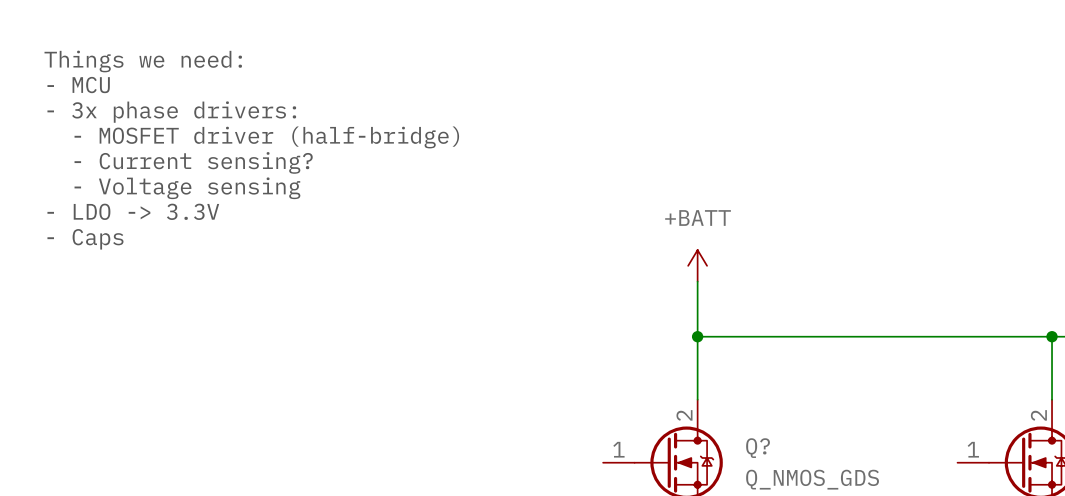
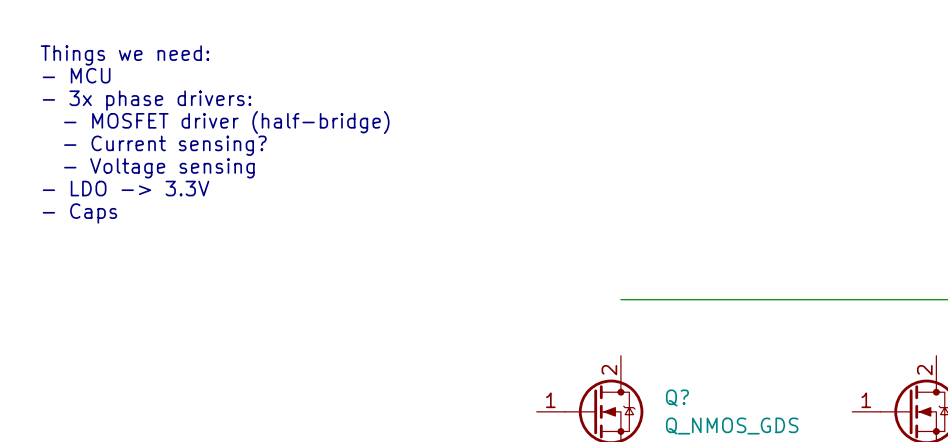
power symbol: +BATT (697, 265) -> none
wire: (697, 281) (697, 399) -> none
junction: (697, 336) -> none
wire: (1052, 336) (1052, 399) -> none
junction: (1052, 336) -> none

